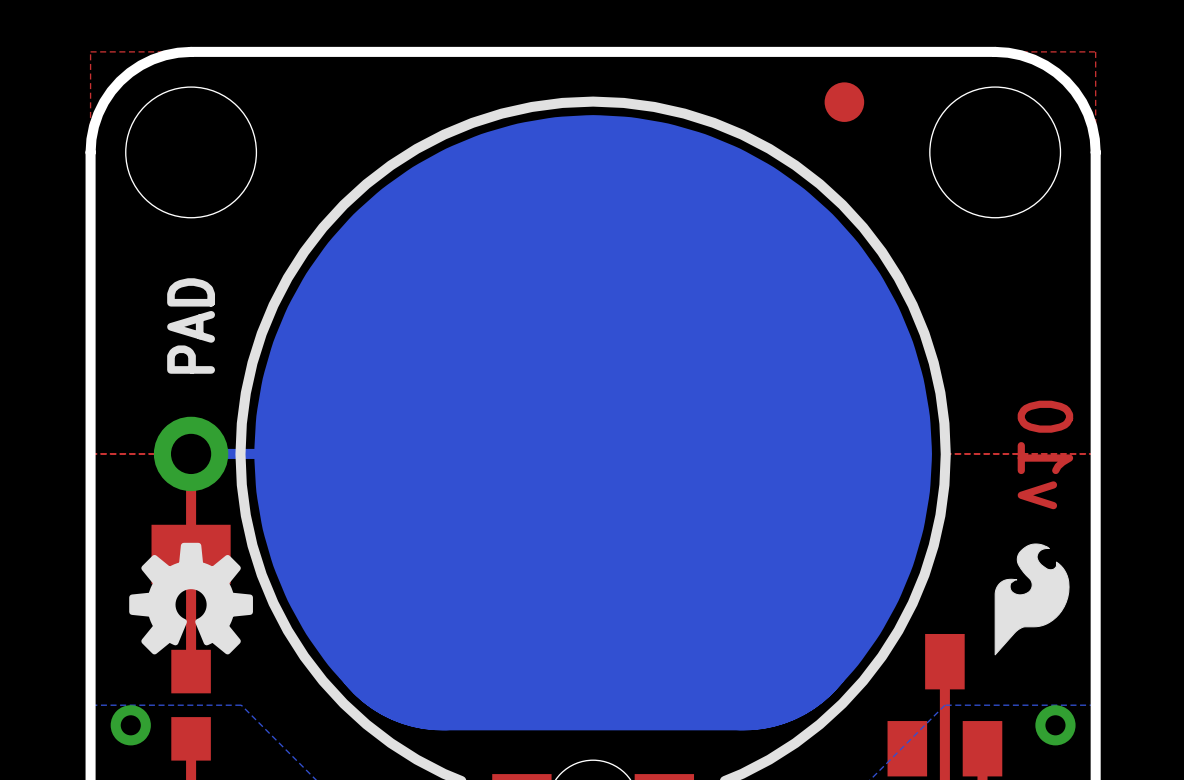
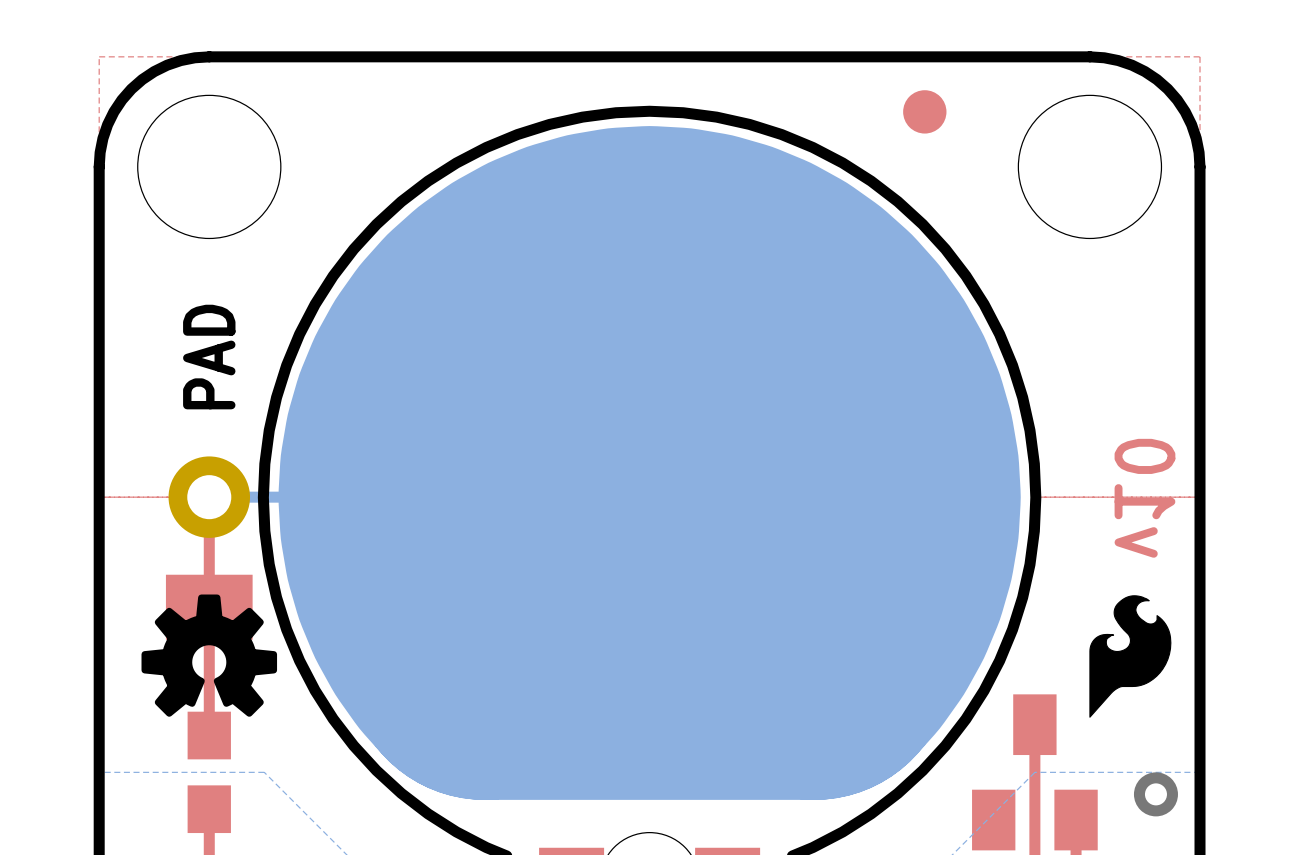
via: (130, 725) -> none

